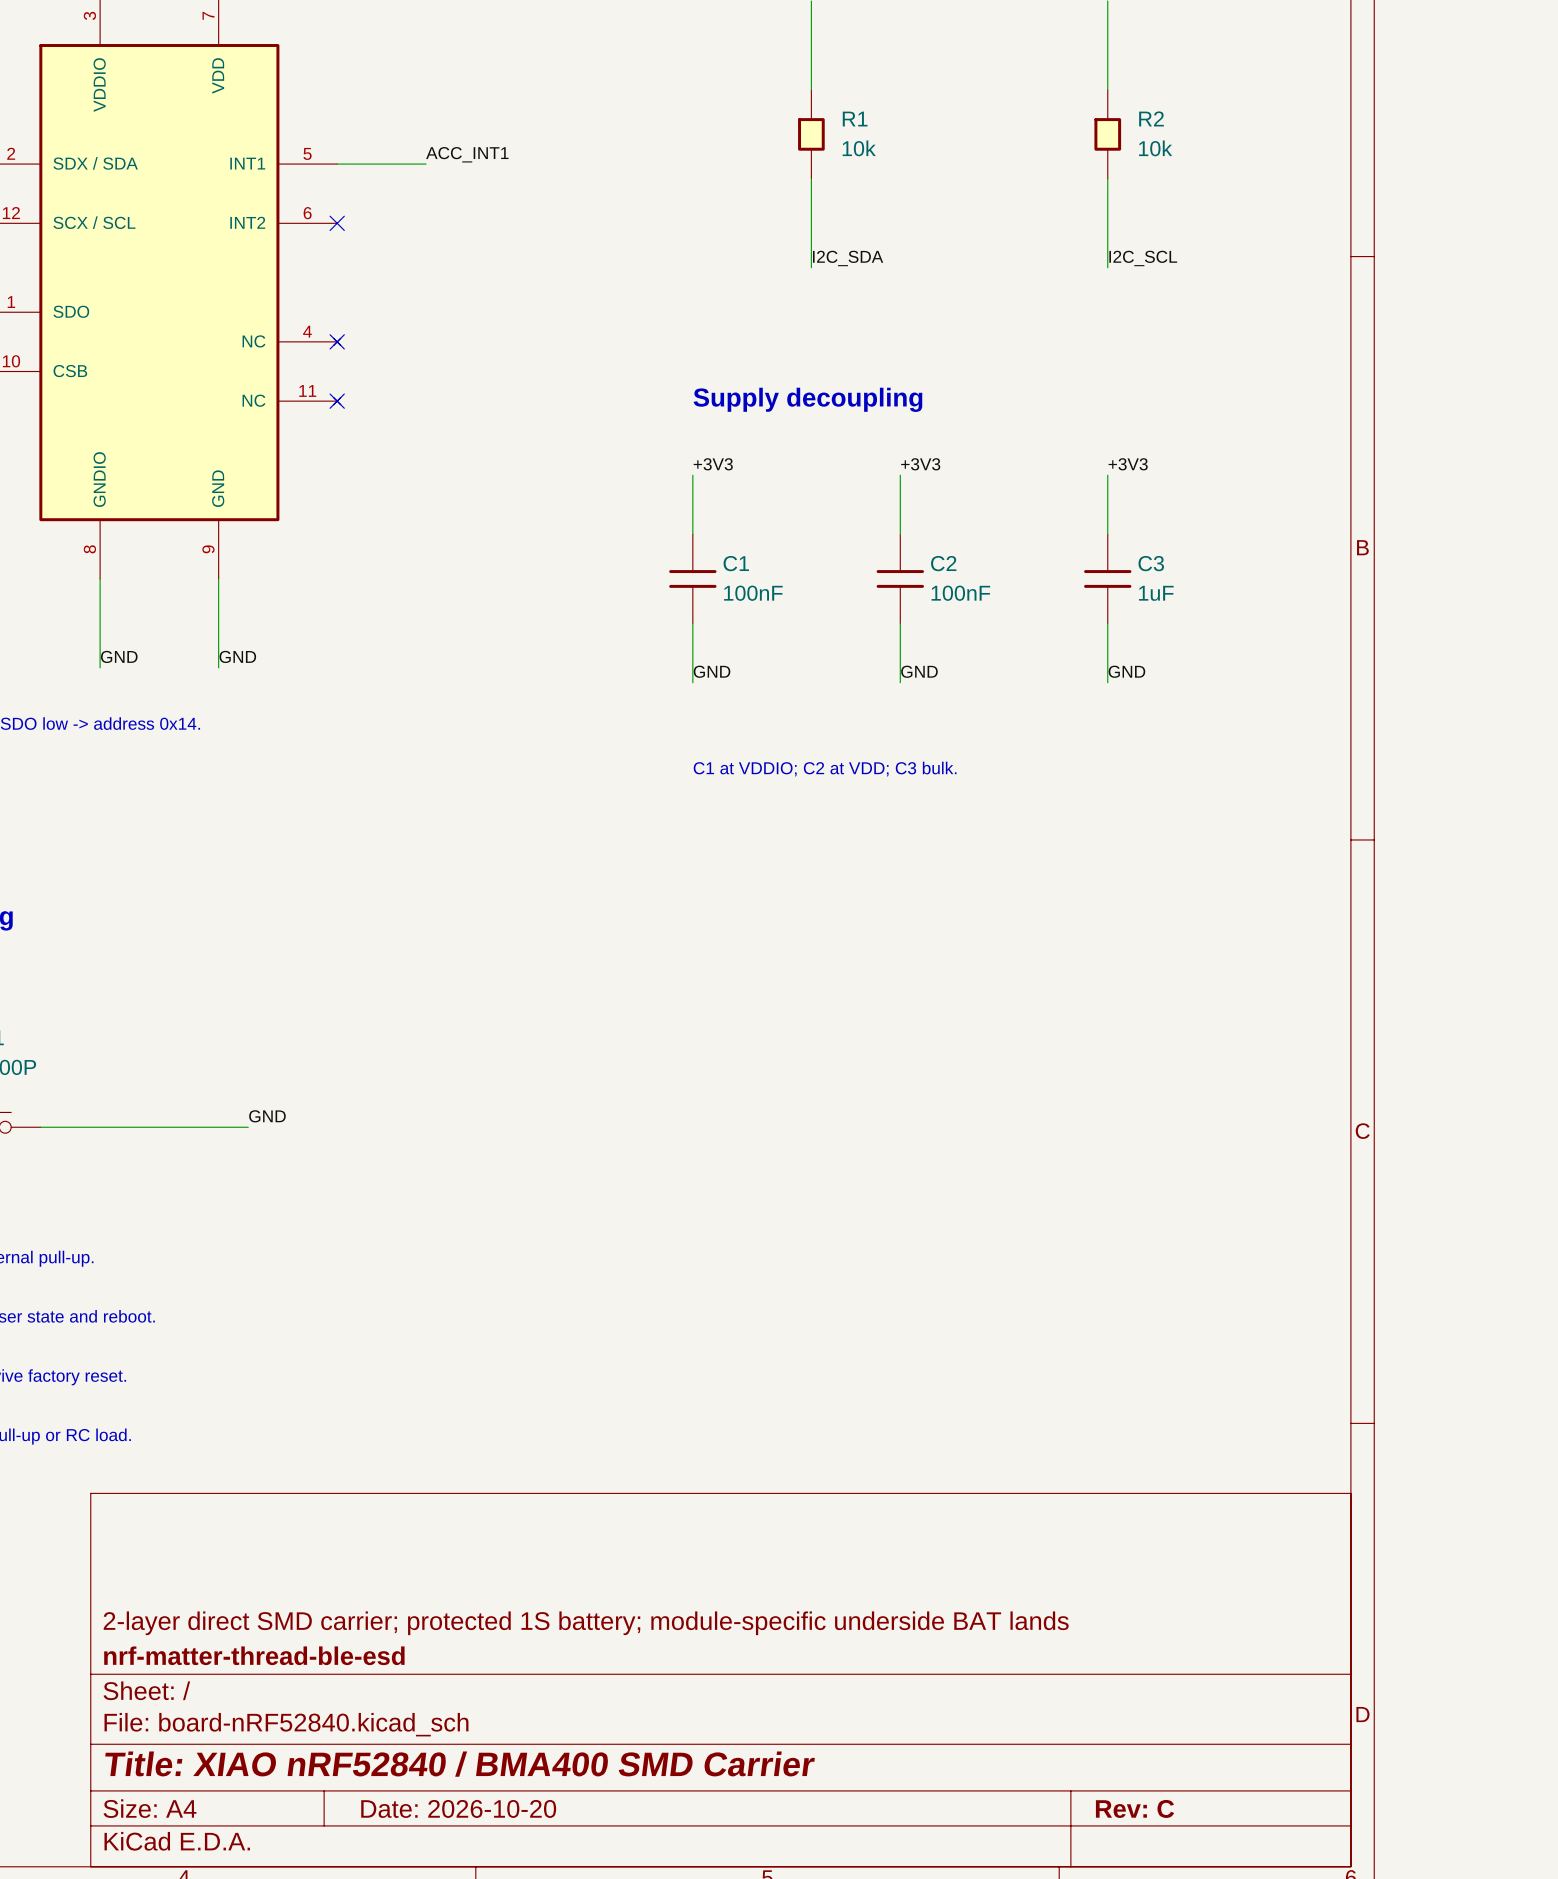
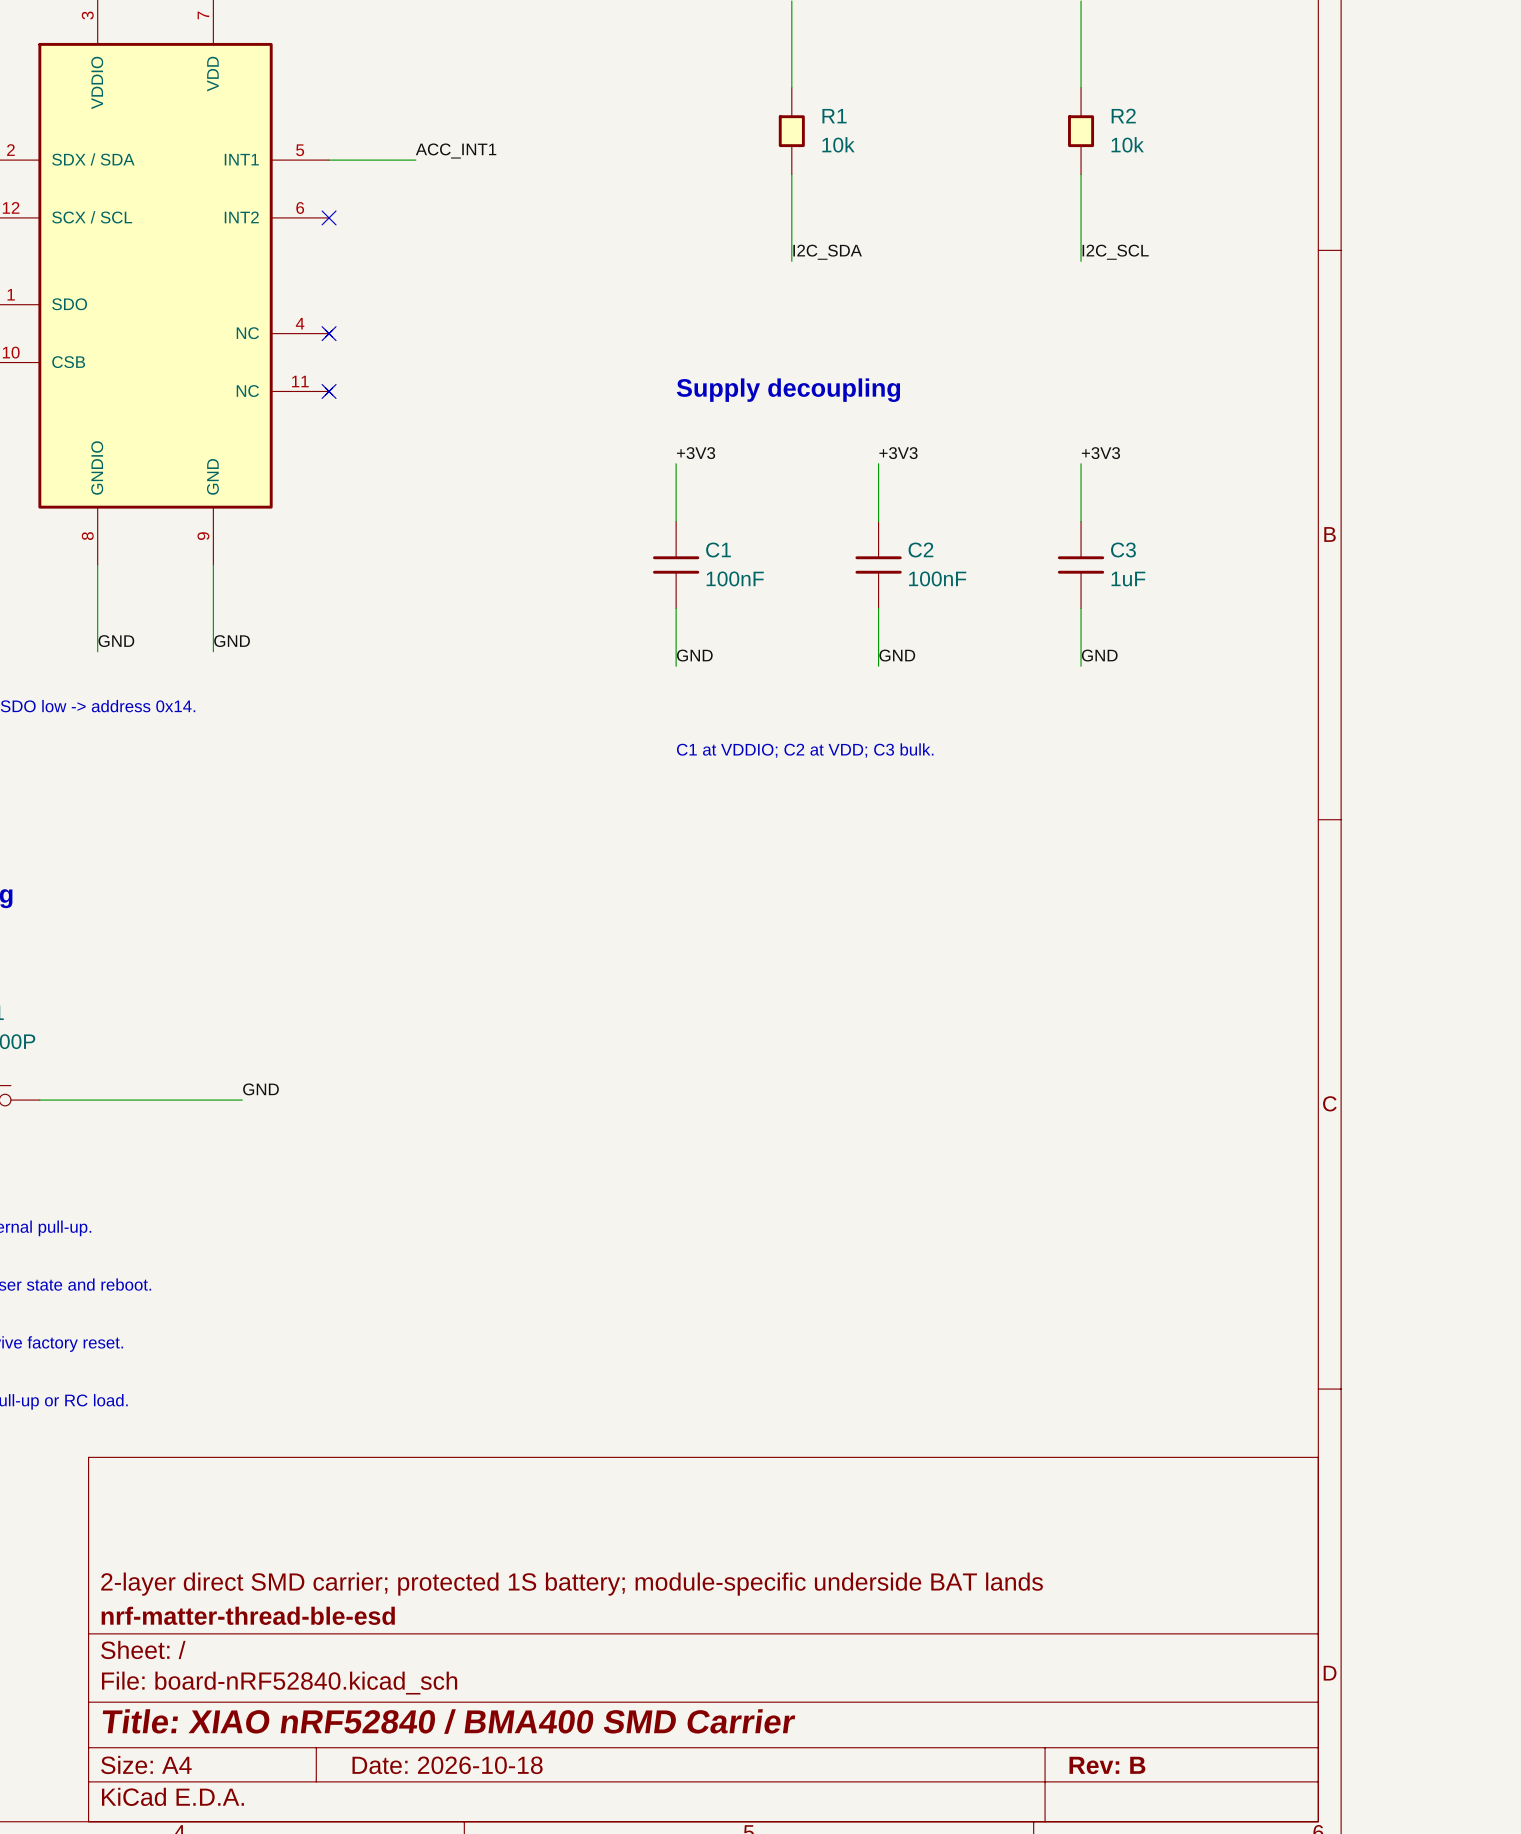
title block: Date: 2026-10-20 (458, 1808) -> Date: 2026-10-18 (447, 1765)
title block: Rev: C (1135, 1808) -> Rev: B (1107, 1765)

